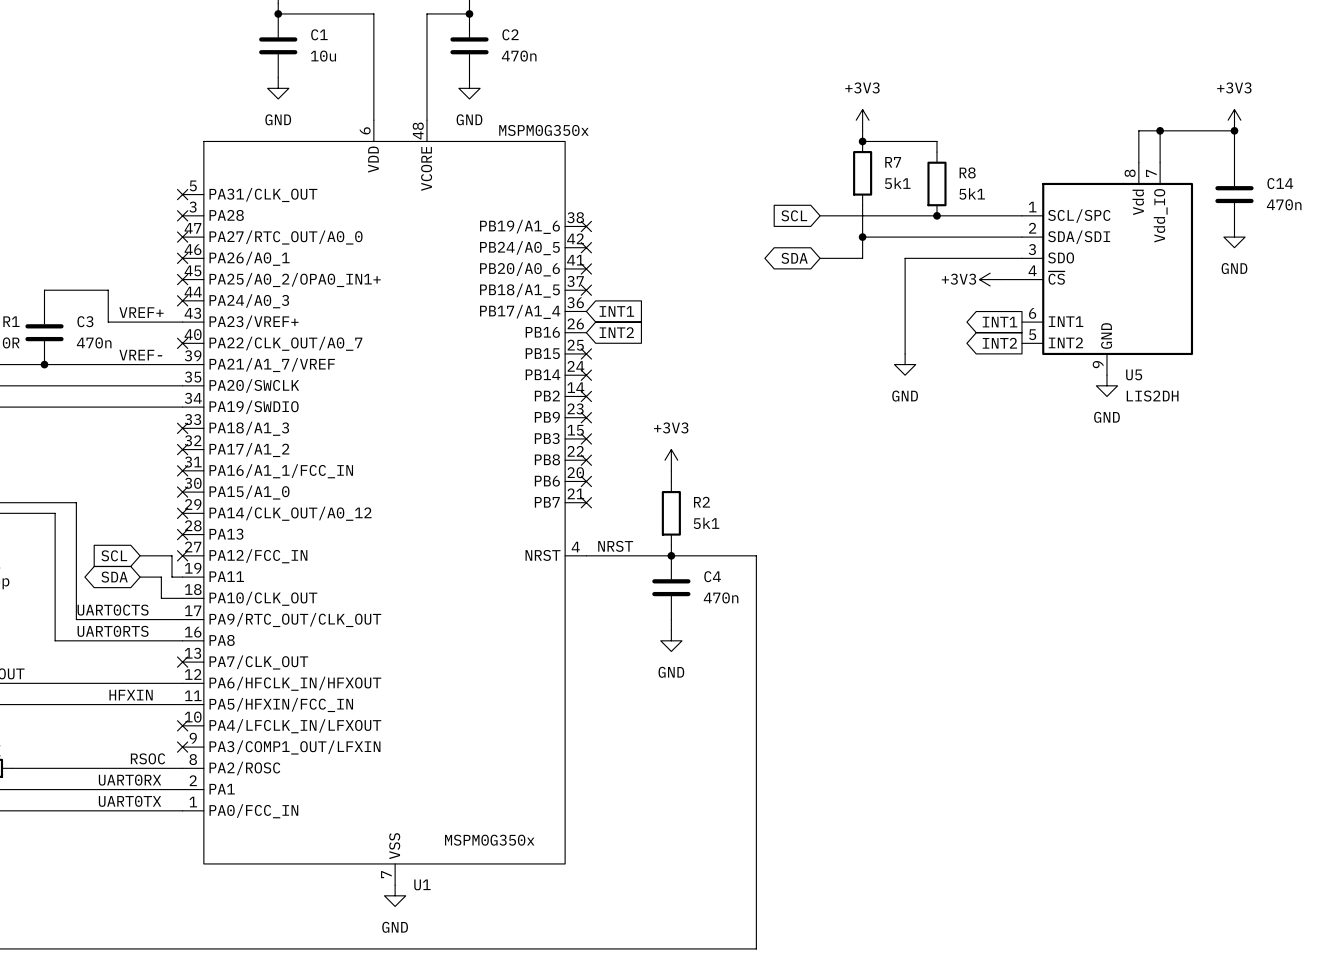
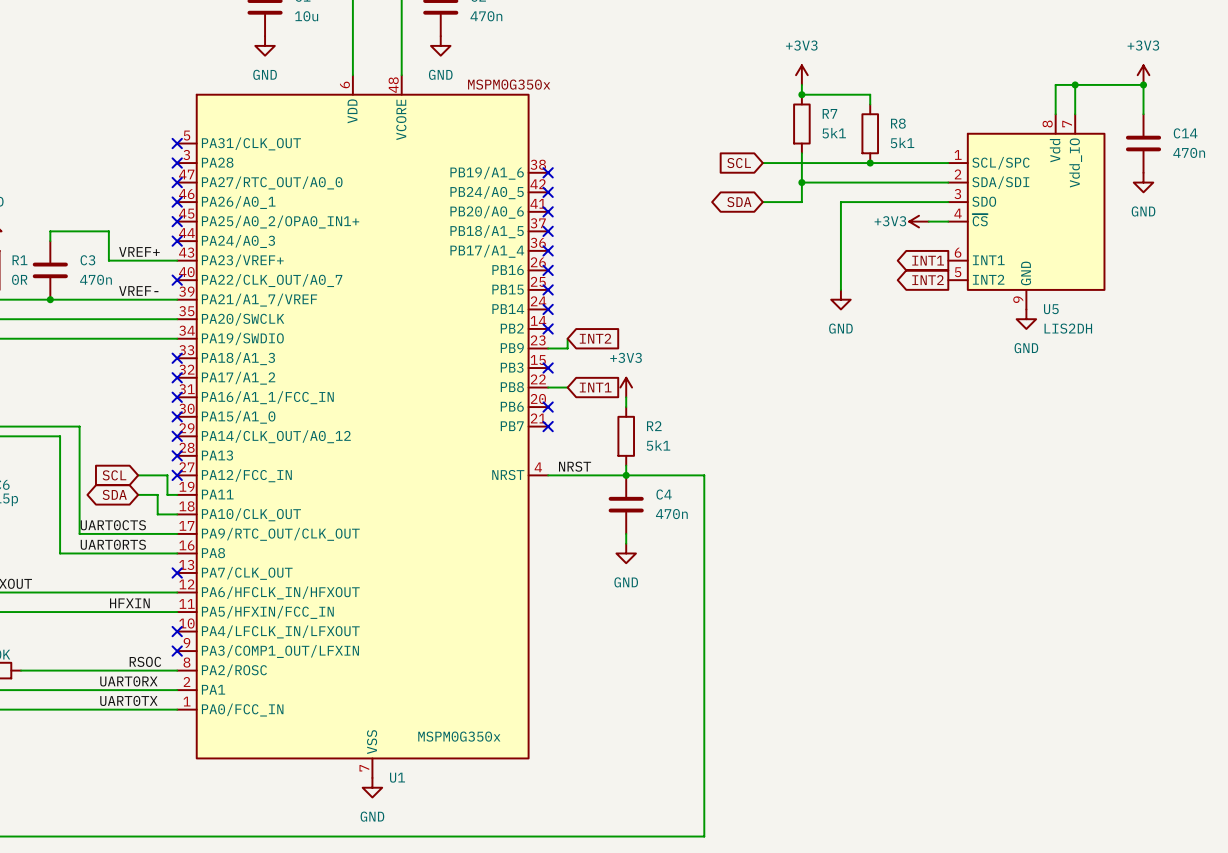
no-connect mark: none -> (548, 250)
global label position: INT1 (616, 311) -> INT1 (595, 387)
no-connect mark: none -> (548, 270)
global label position: INT2 (616, 332) -> INT2 (595, 338)
wire: none -> (567, 338) (567, 348) (548, 348)
no-connect mark: (586, 417) -> none
wire: none -> (548, 387) (567, 387)
no-connect mark: (586, 460) -> none

